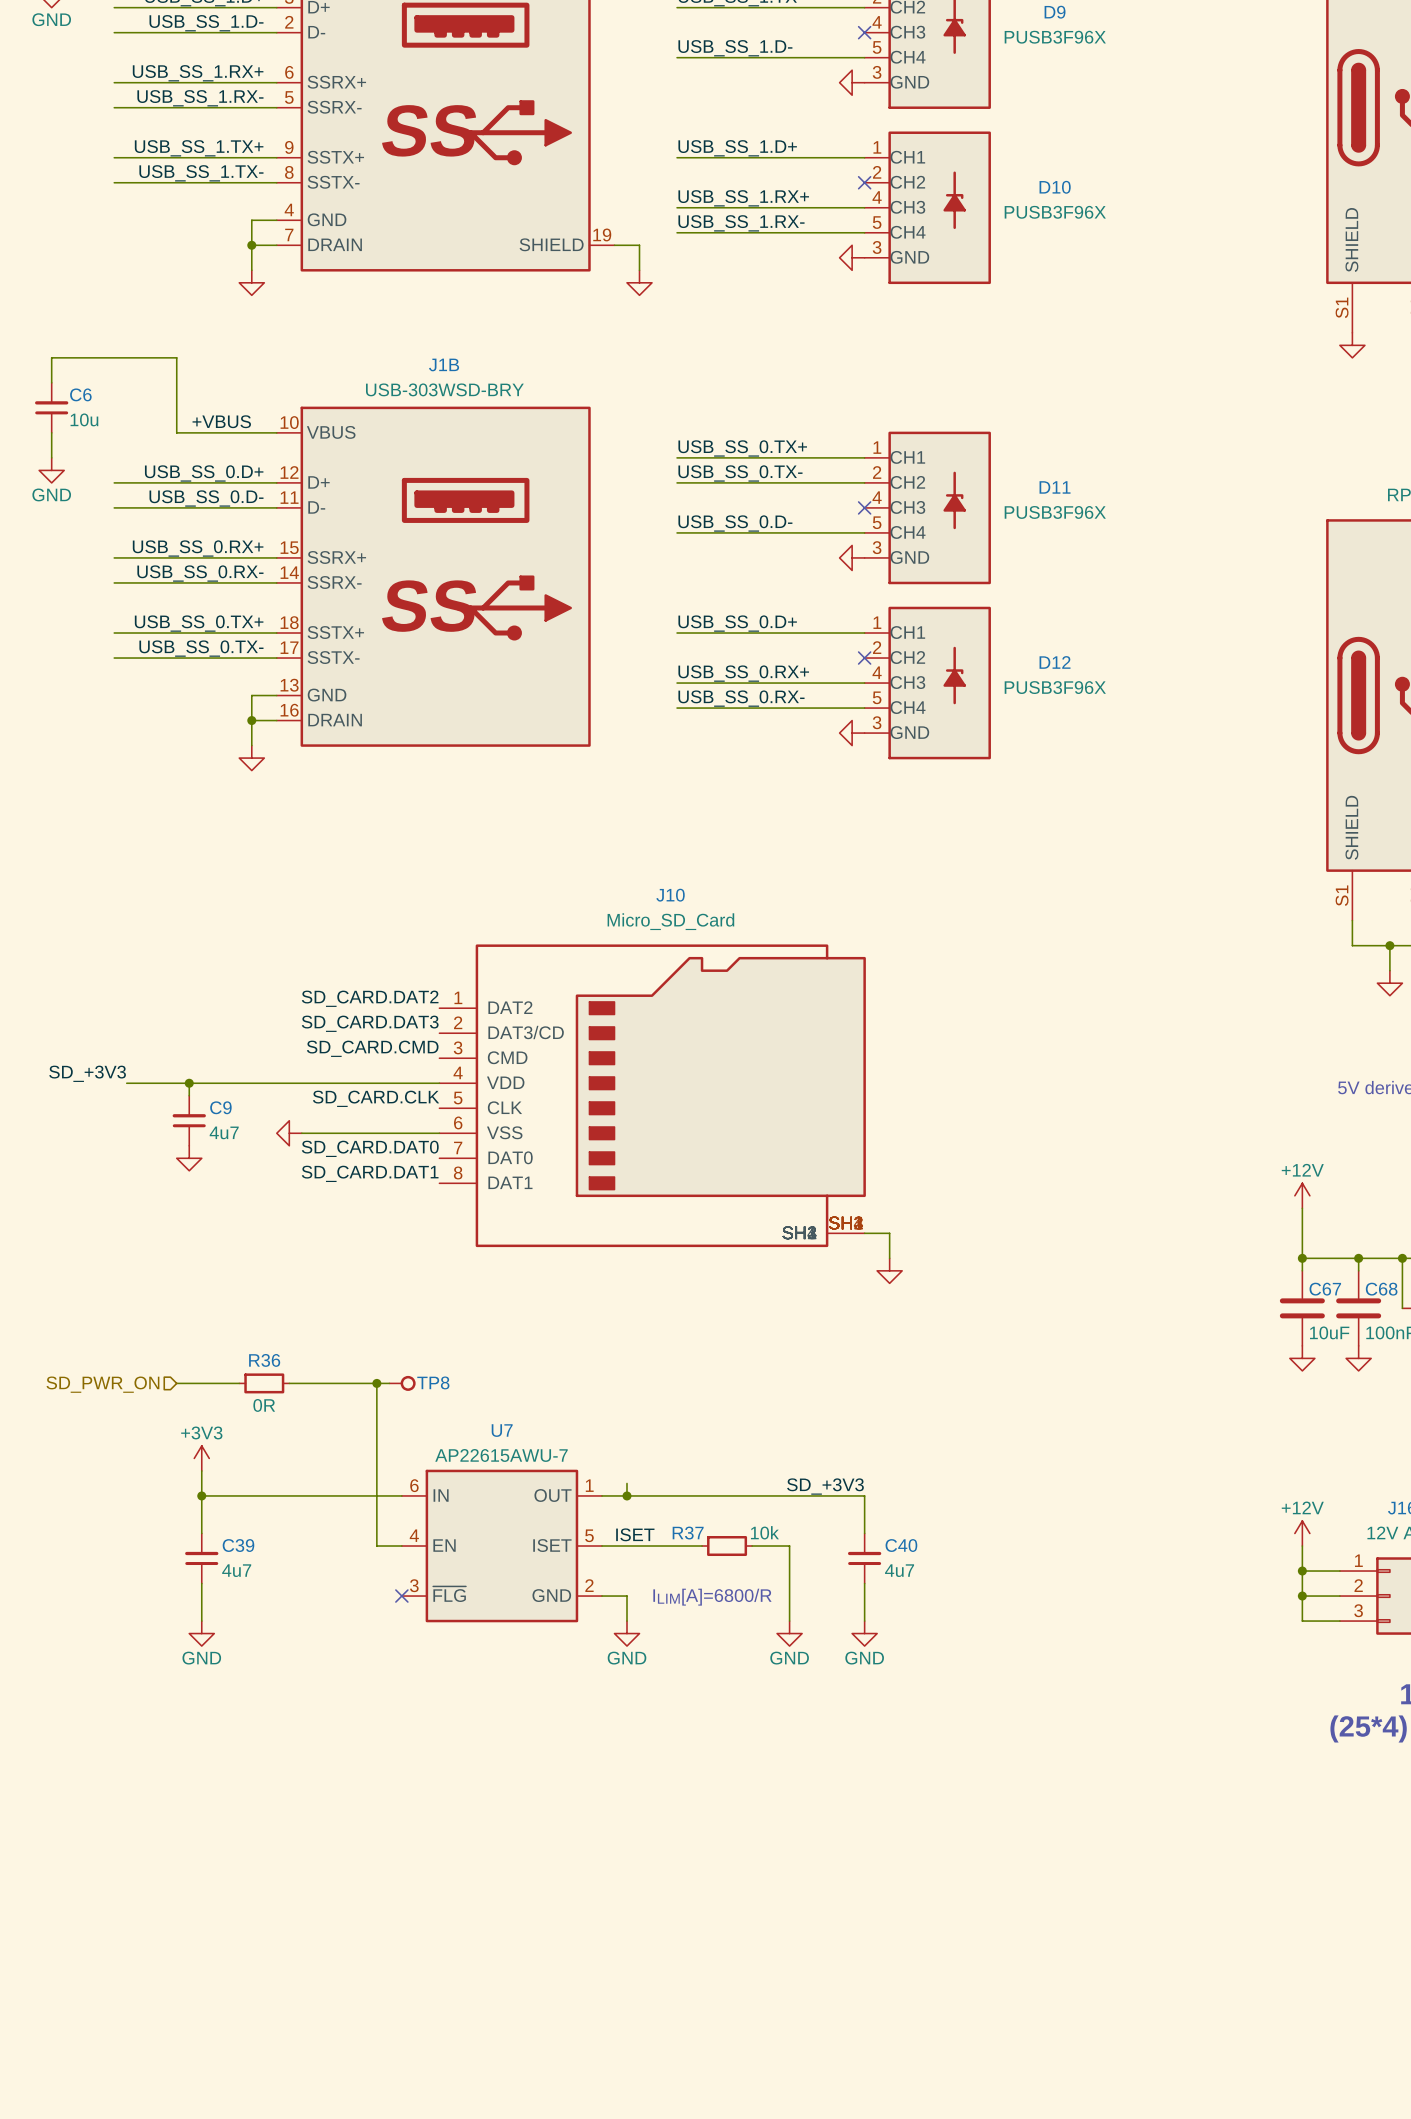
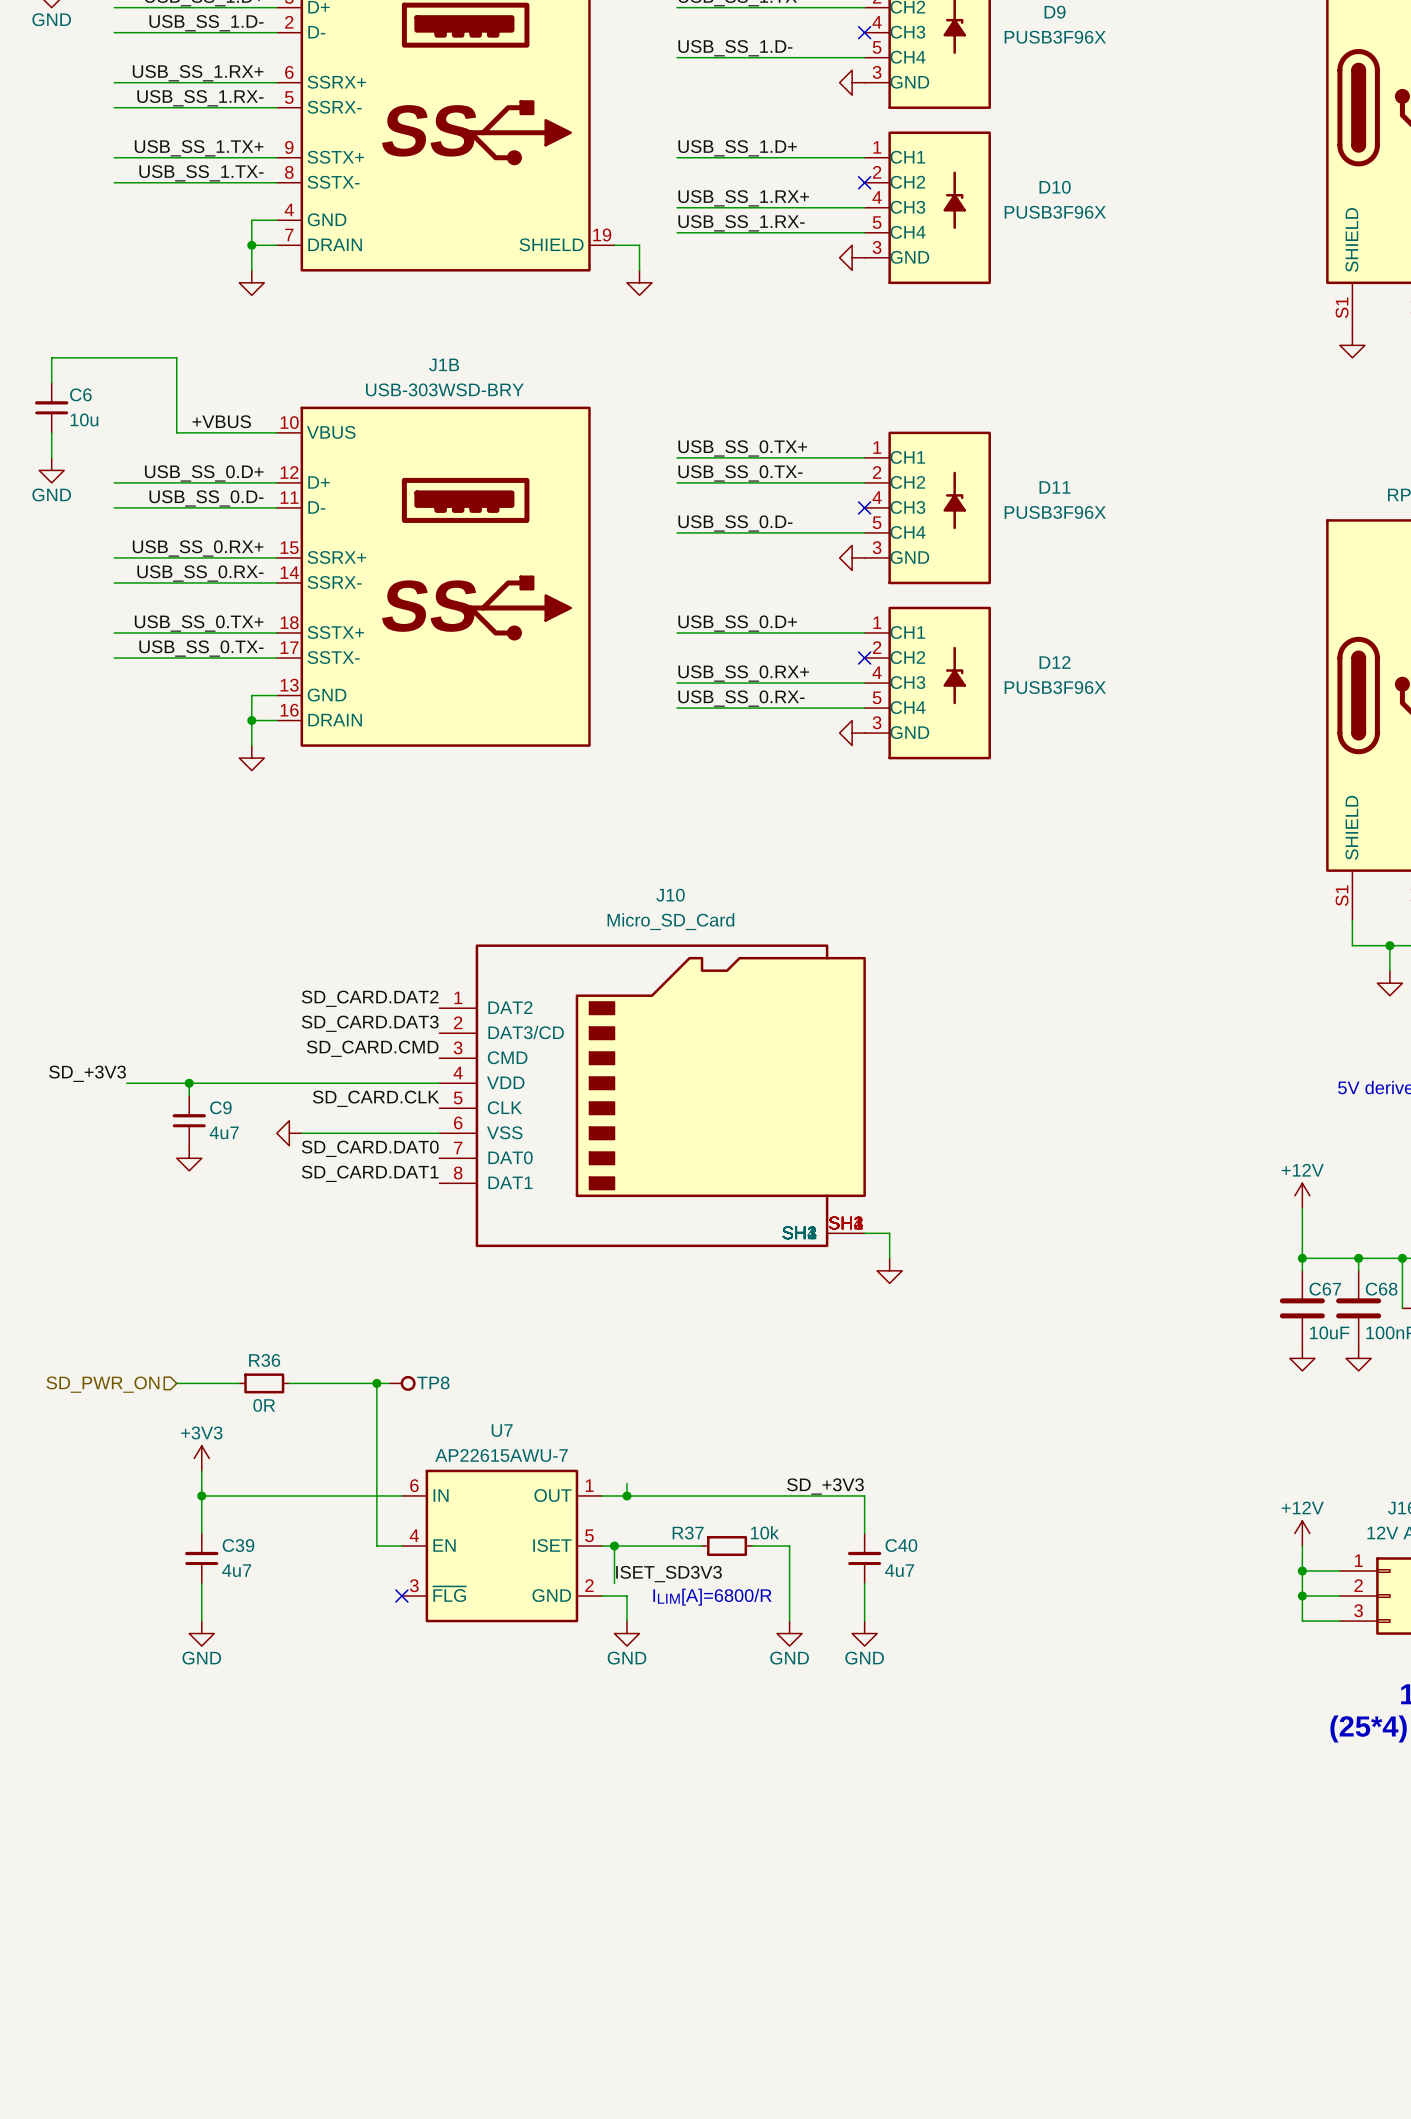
label: ISET (635, 1534) -> none
wire: none -> (614, 1546) (614, 1583)
junction: none -> (614, 1546)
label: none -> ISET_SD3V3 (668, 1574)

